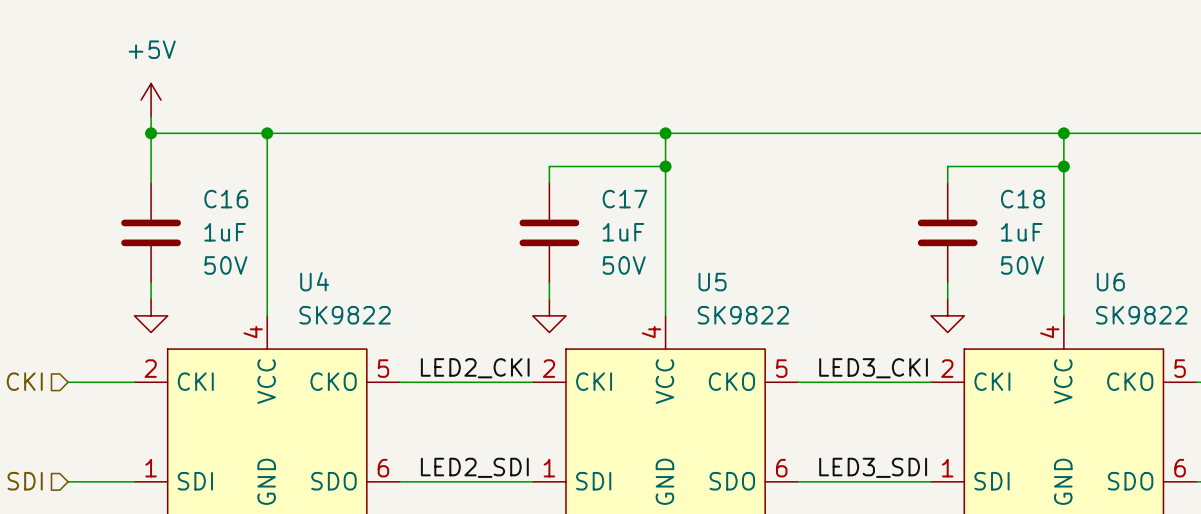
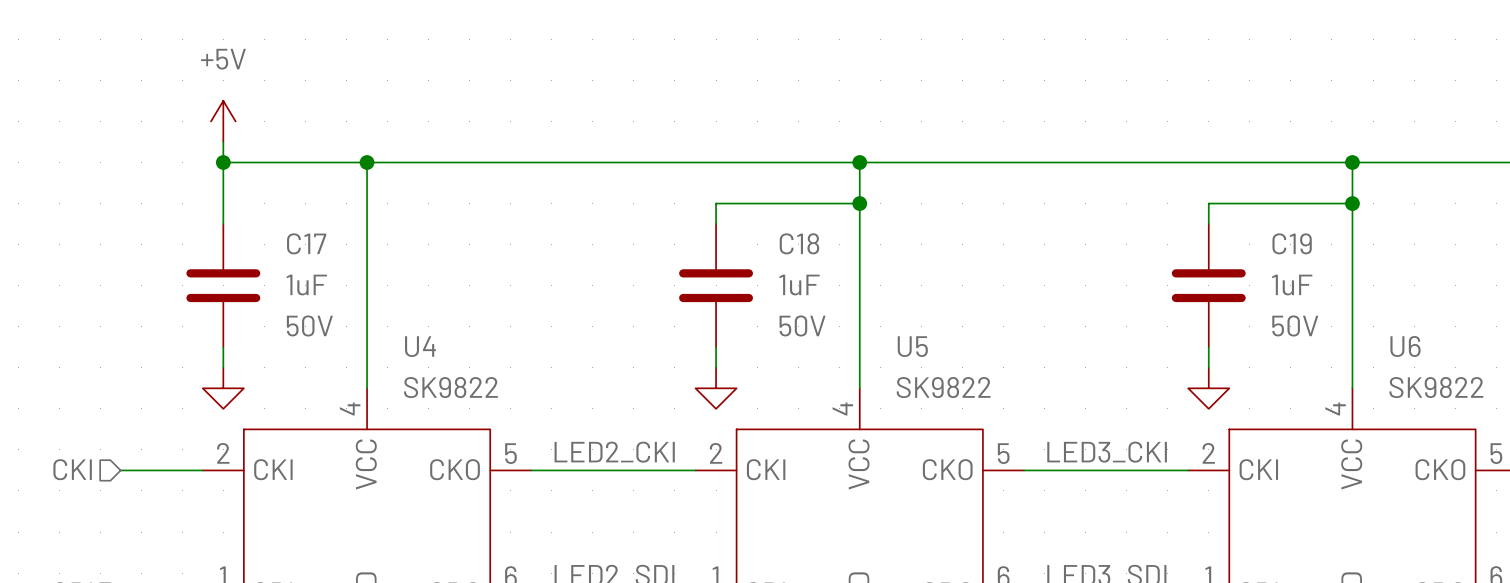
C16 name: C16 (226, 199) -> C17 (306, 243)
C17 name: C17 (624, 199) -> C18 (799, 243)
C18 name: C18 (1022, 199) -> C19 (1292, 243)

